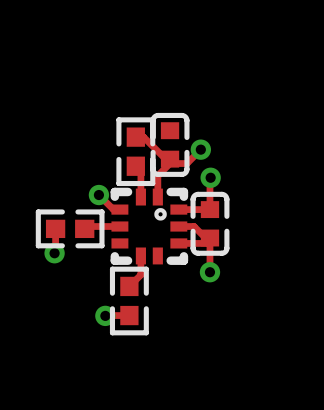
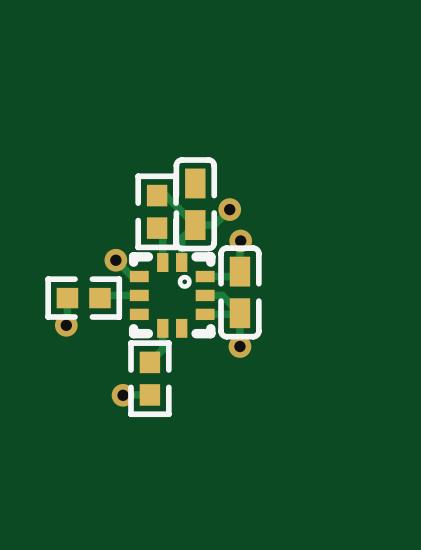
part footprint: [150, 112, 190, 177] -> [173, 157, 218, 252]
part footprint: [190, 191, 230, 256] -> [218, 245, 262, 340]

